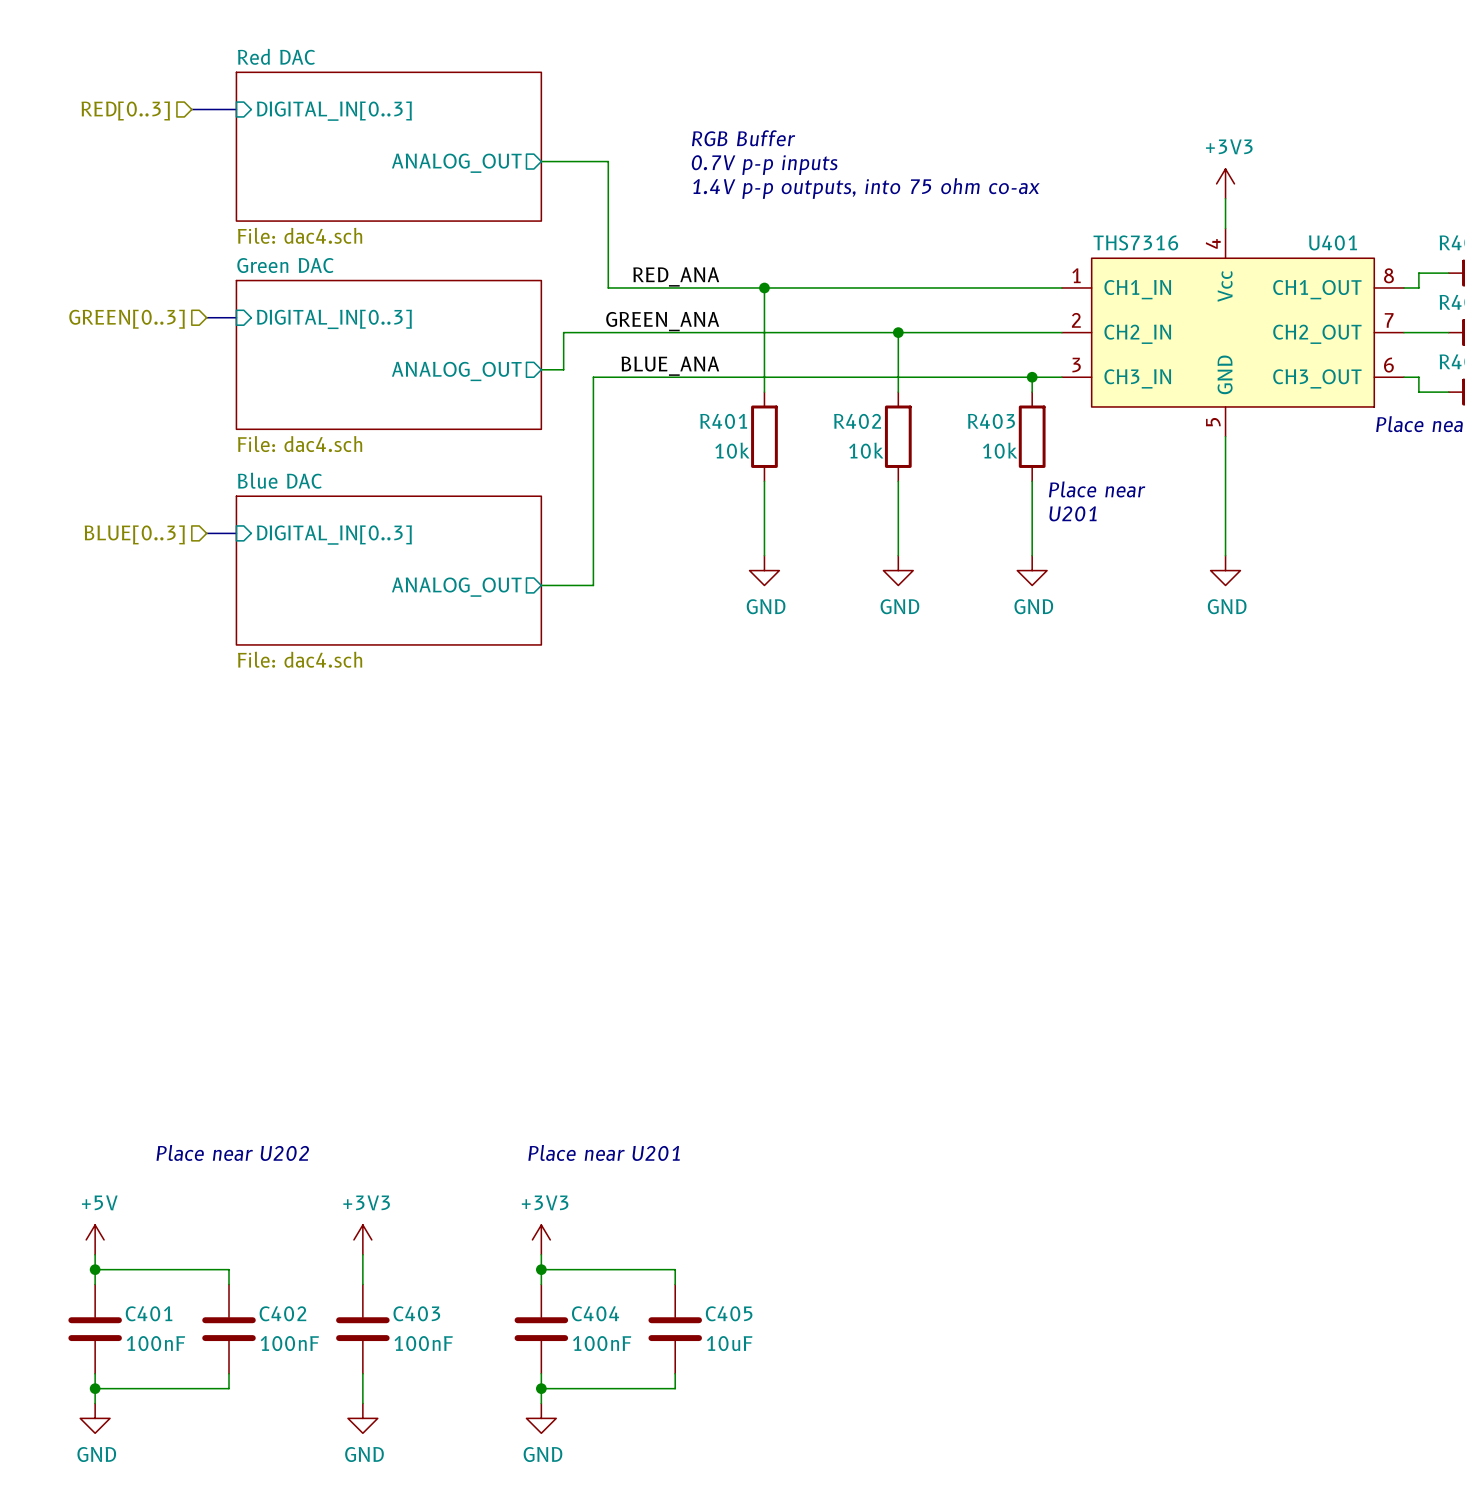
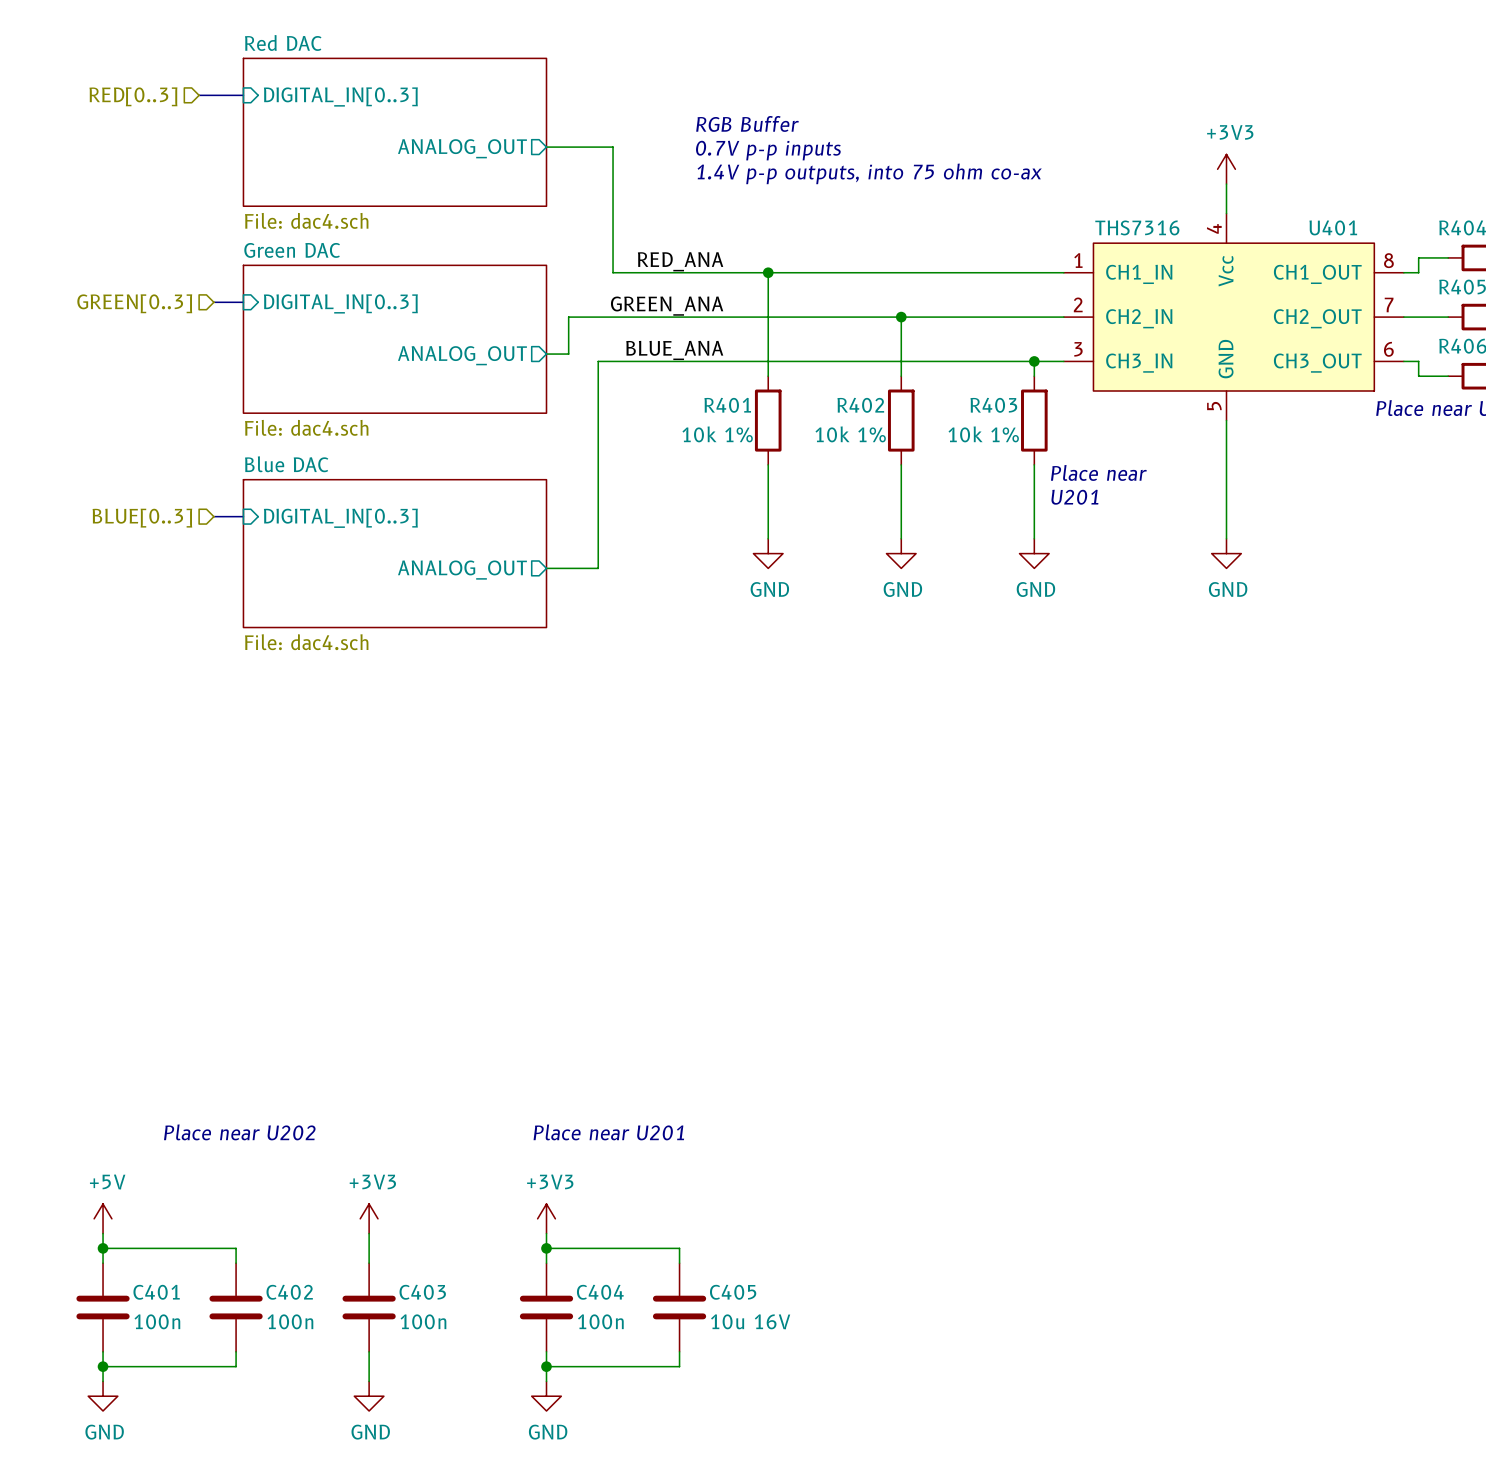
R401 value: 10k (732, 450) -> 10k 1% (717, 434)
R402 value: 10k (866, 450) -> 10k 1% (850, 434)
R403 value: 10k (1000, 450) -> 10k 1% (983, 434)
C401 value: 100nF (155, 1343) -> 100n (157, 1321)
C402 value: 100nF (289, 1343) -> 100n (290, 1321)
C403 value: 100nF (423, 1343) -> 100n (423, 1321)
C404 value: 100nF (602, 1343) -> 100n (600, 1321)
C405 value: 10uF (729, 1343) -> 10u 16V (750, 1321)

